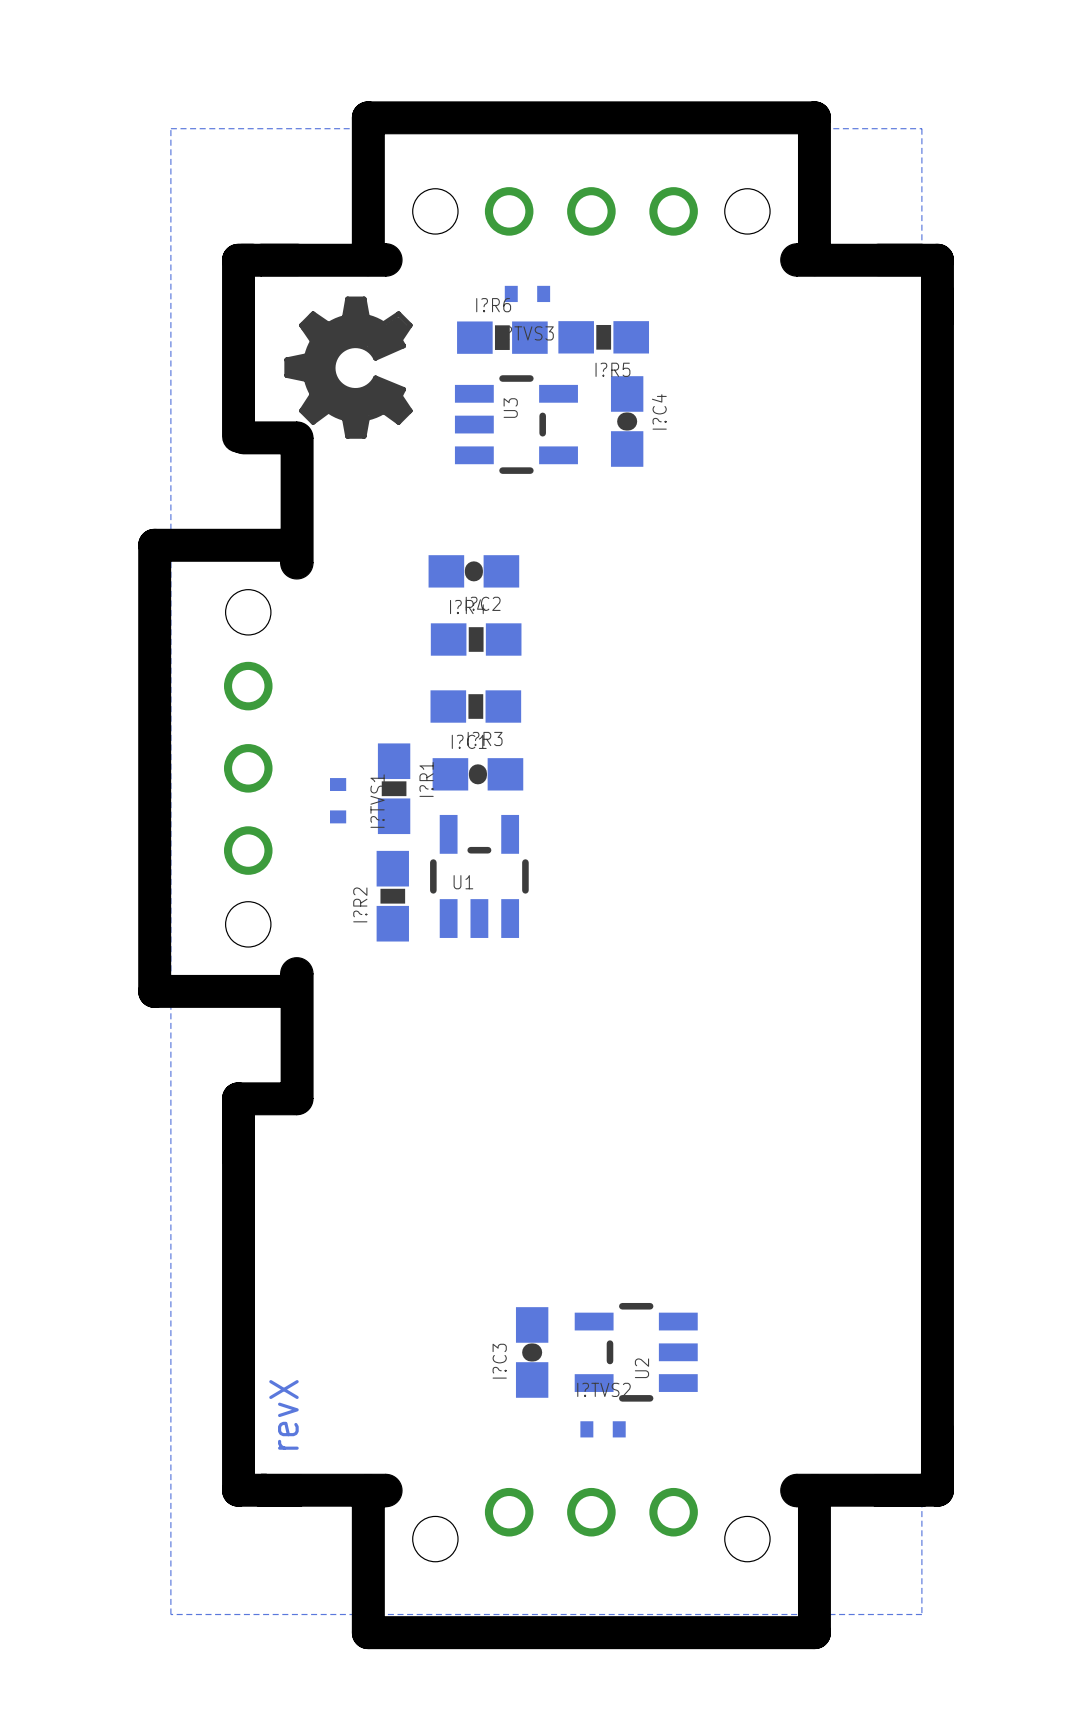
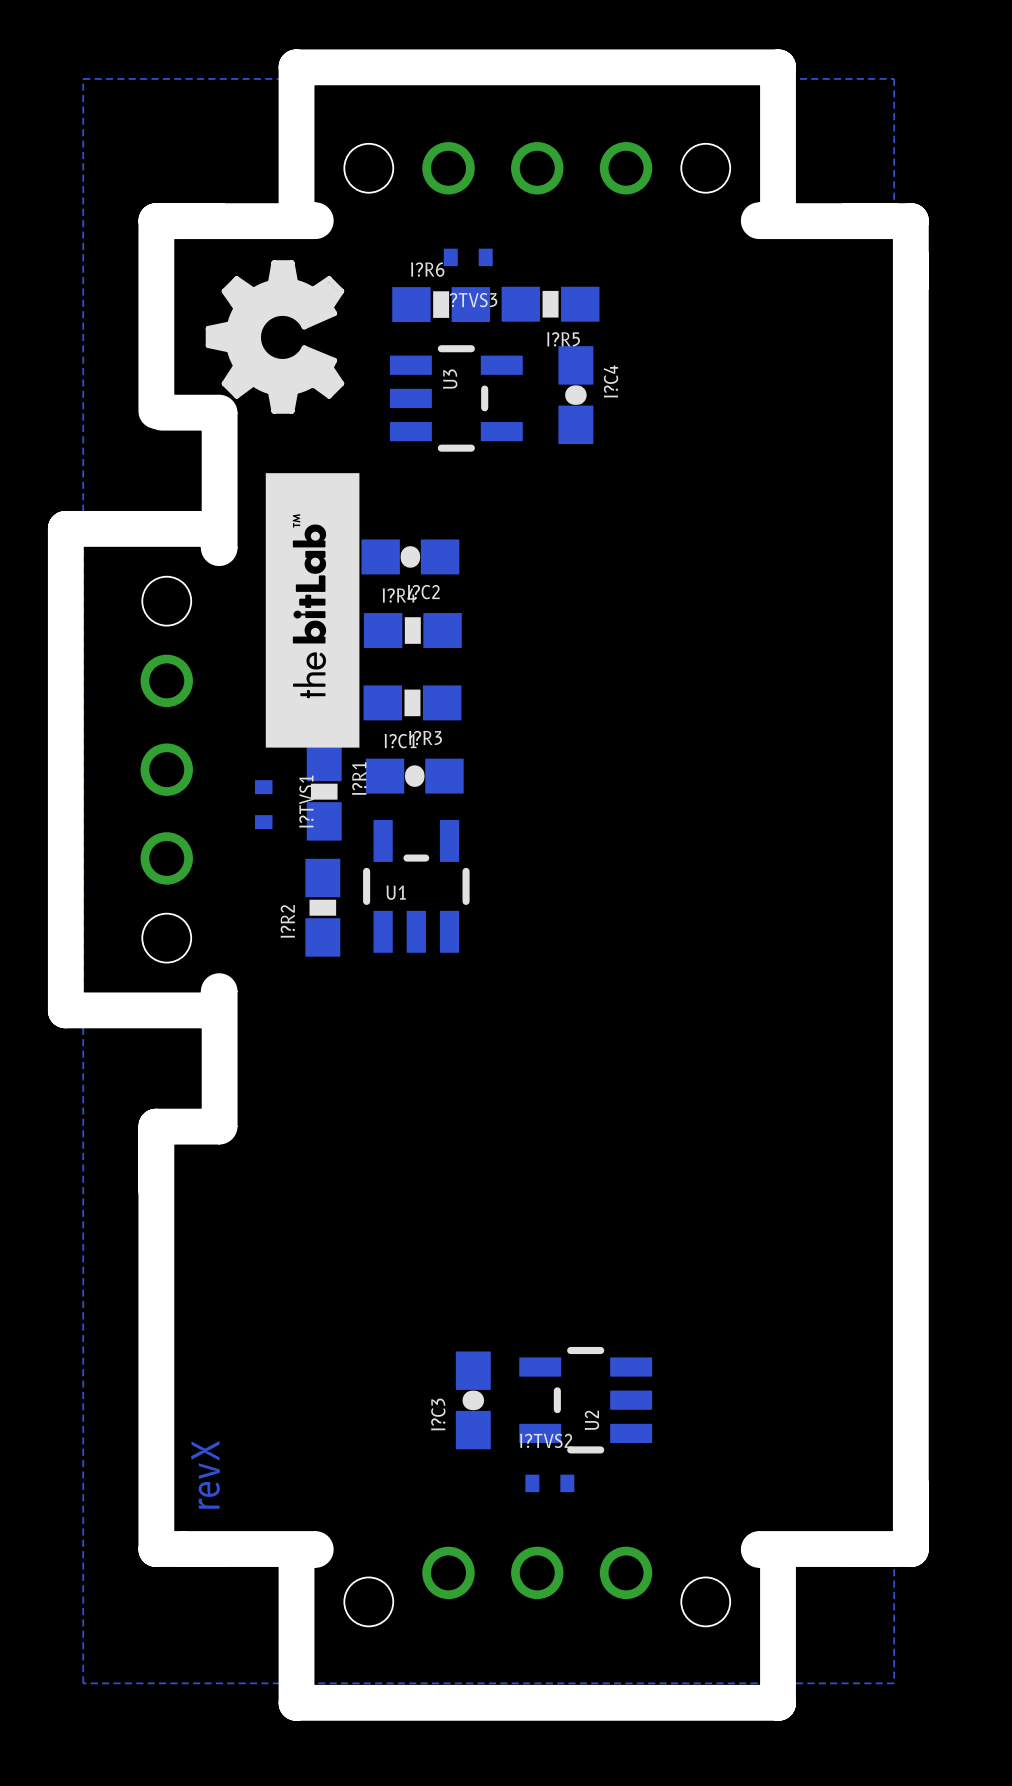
drawing: none -> [265, 473, 360, 748]

